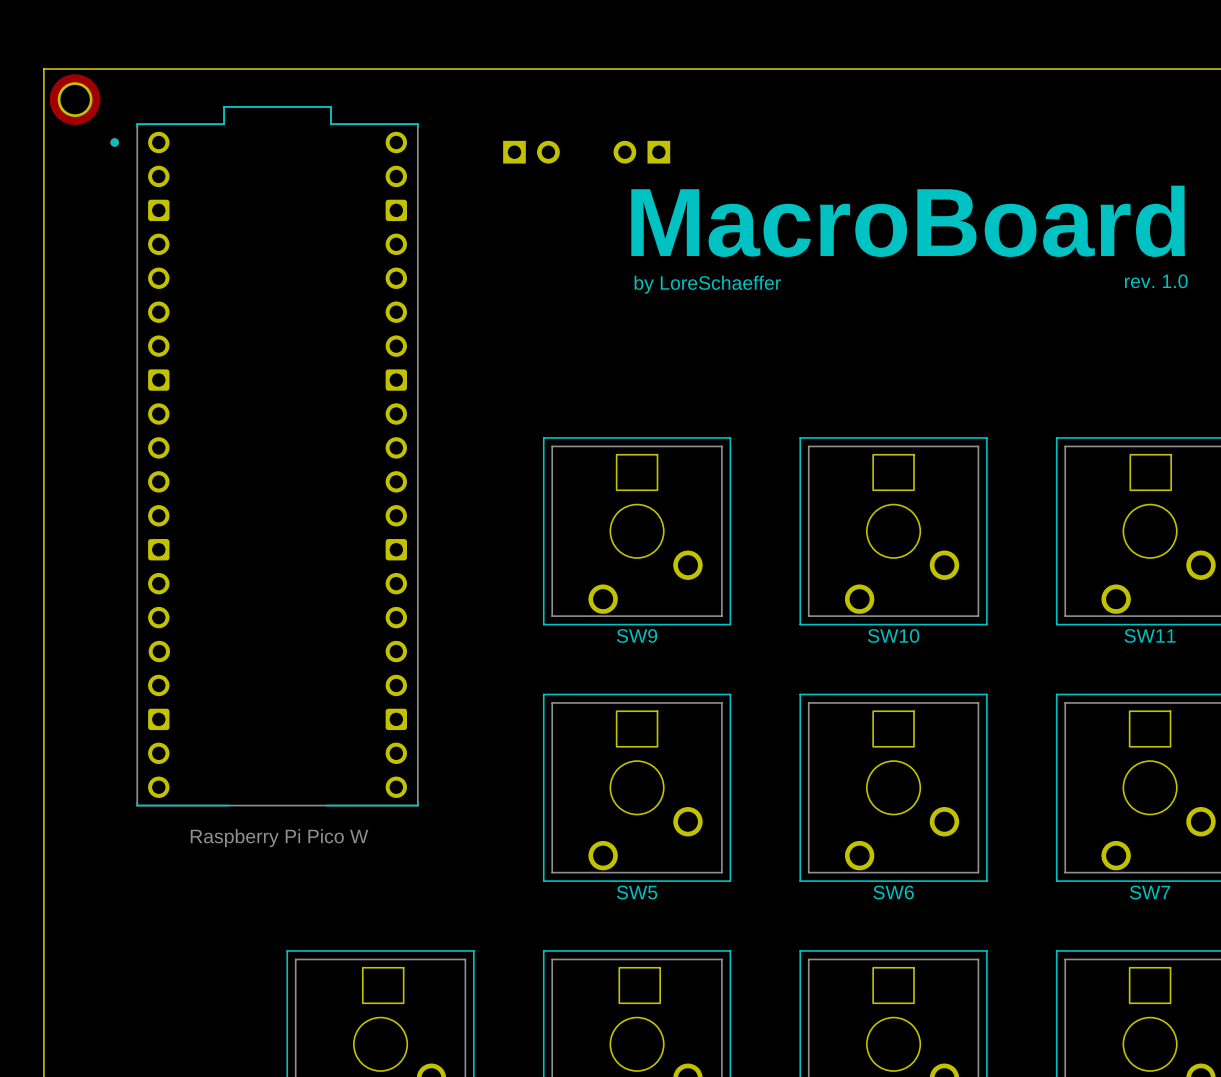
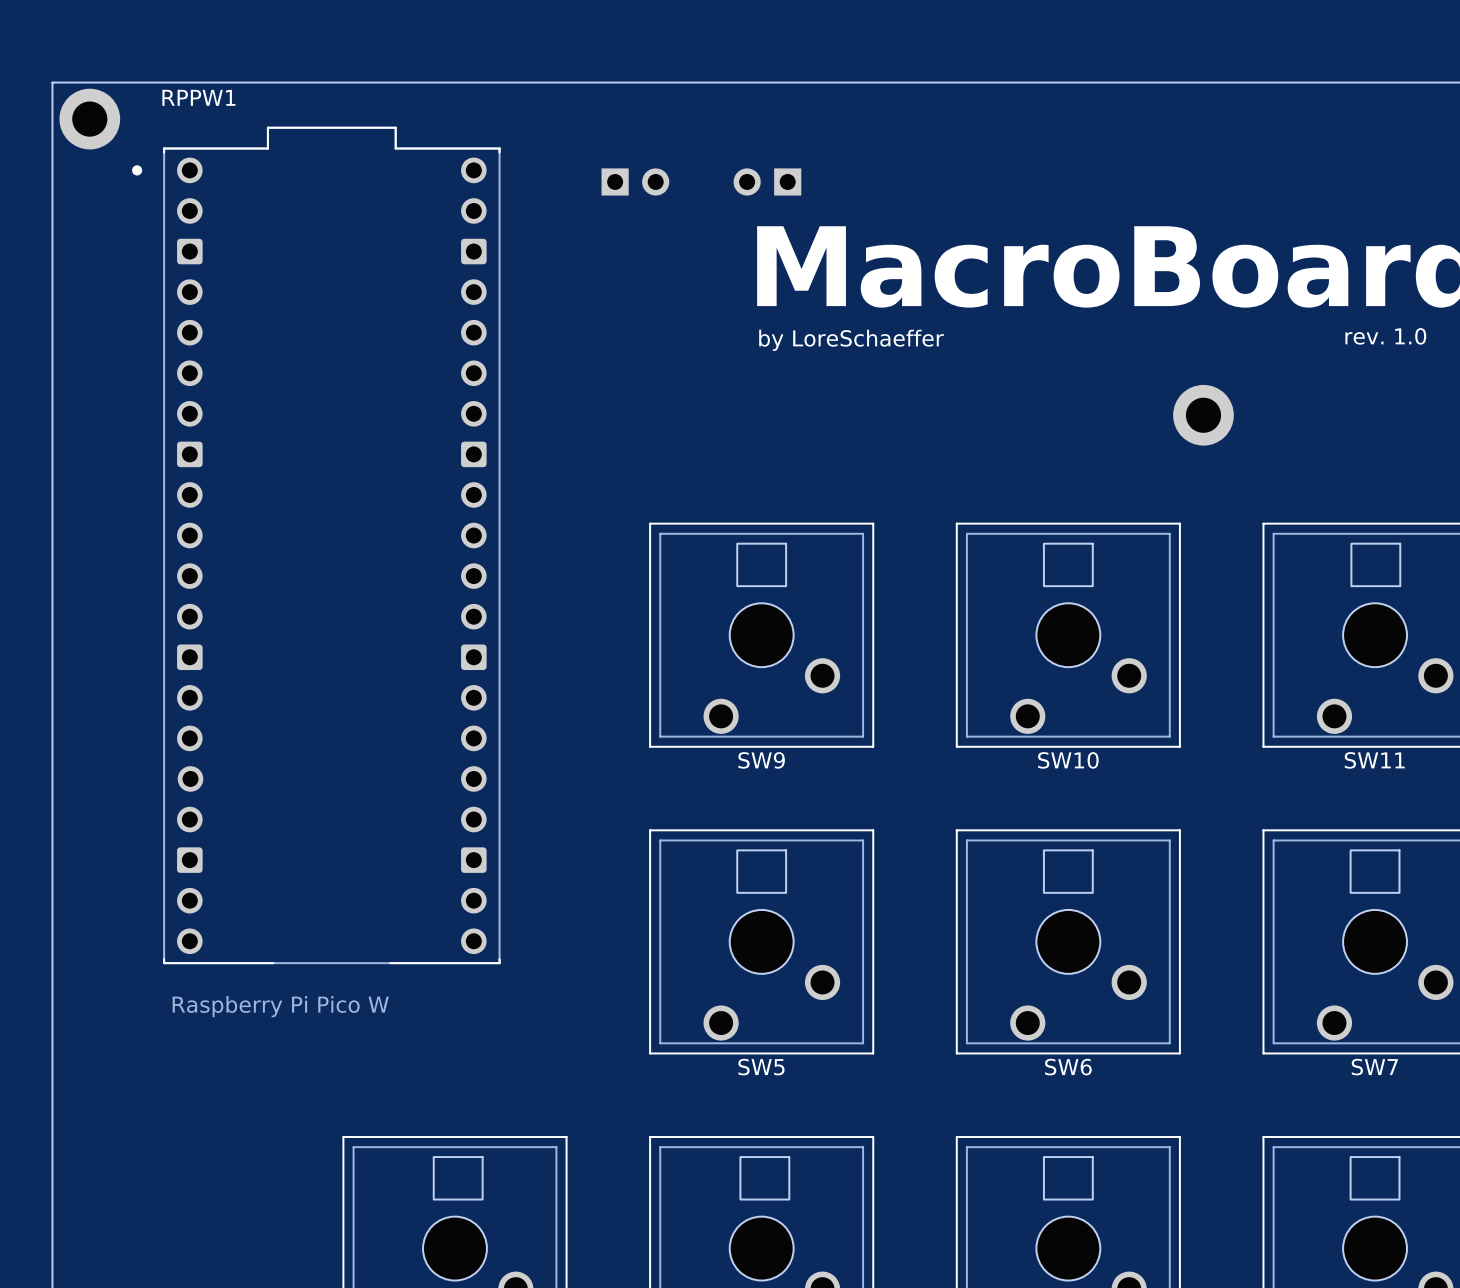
RPPW1 name: none -> RPPW1 (198, 97)
part: none -> (1203, 415)
RPPW1 value position: Raspberry Pi Pico W (279, 838) -> Raspberry Pi Pico W (280, 1006)

